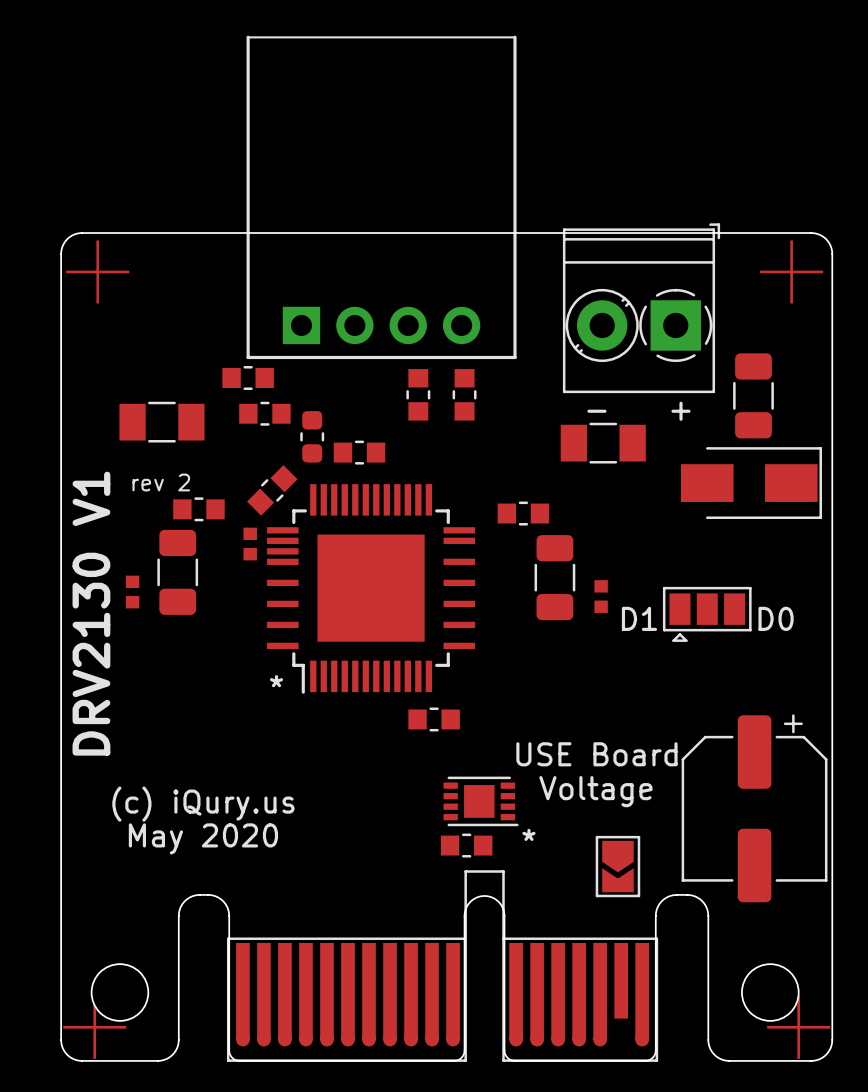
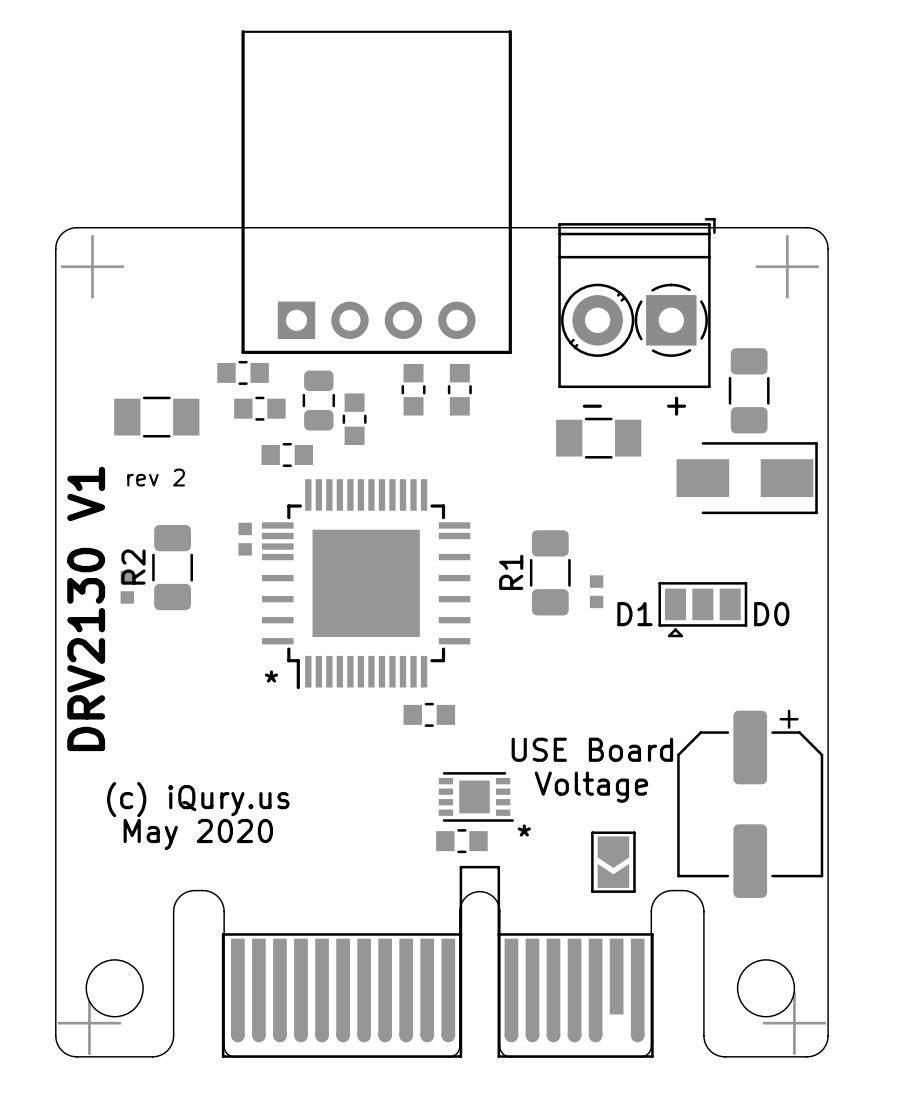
part: none -> (318, 400)
part: (312, 436) -> none
part rotation: 0° (359, 452) -> 90° clockwise (354, 419)
part: none -> (287, 454)
part: (272, 490) -> none
part: (198, 509) -> none
part: (523, 513) -> none
R2 name: none -> R2 (133, 567)
R1 name: none -> R1 (511, 572)

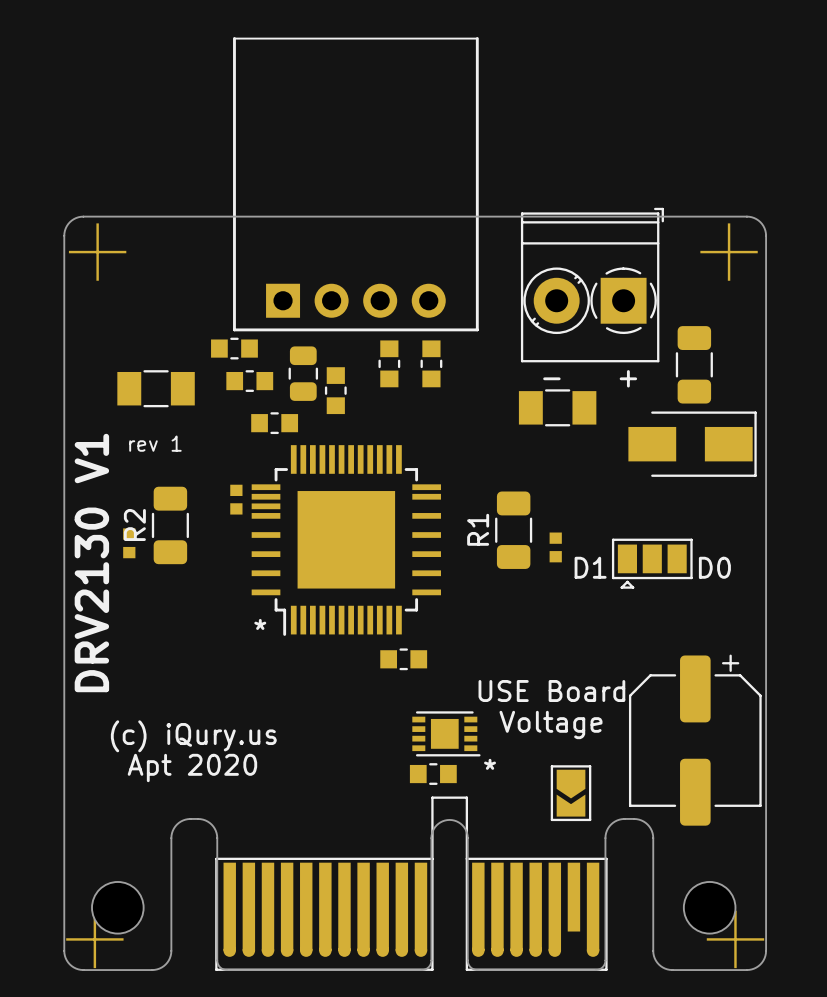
text: rev 2 (156, 477) -> rev 1 (155, 443)
text: May 2020 (198, 834) -> Apt 2020 (192, 768)

